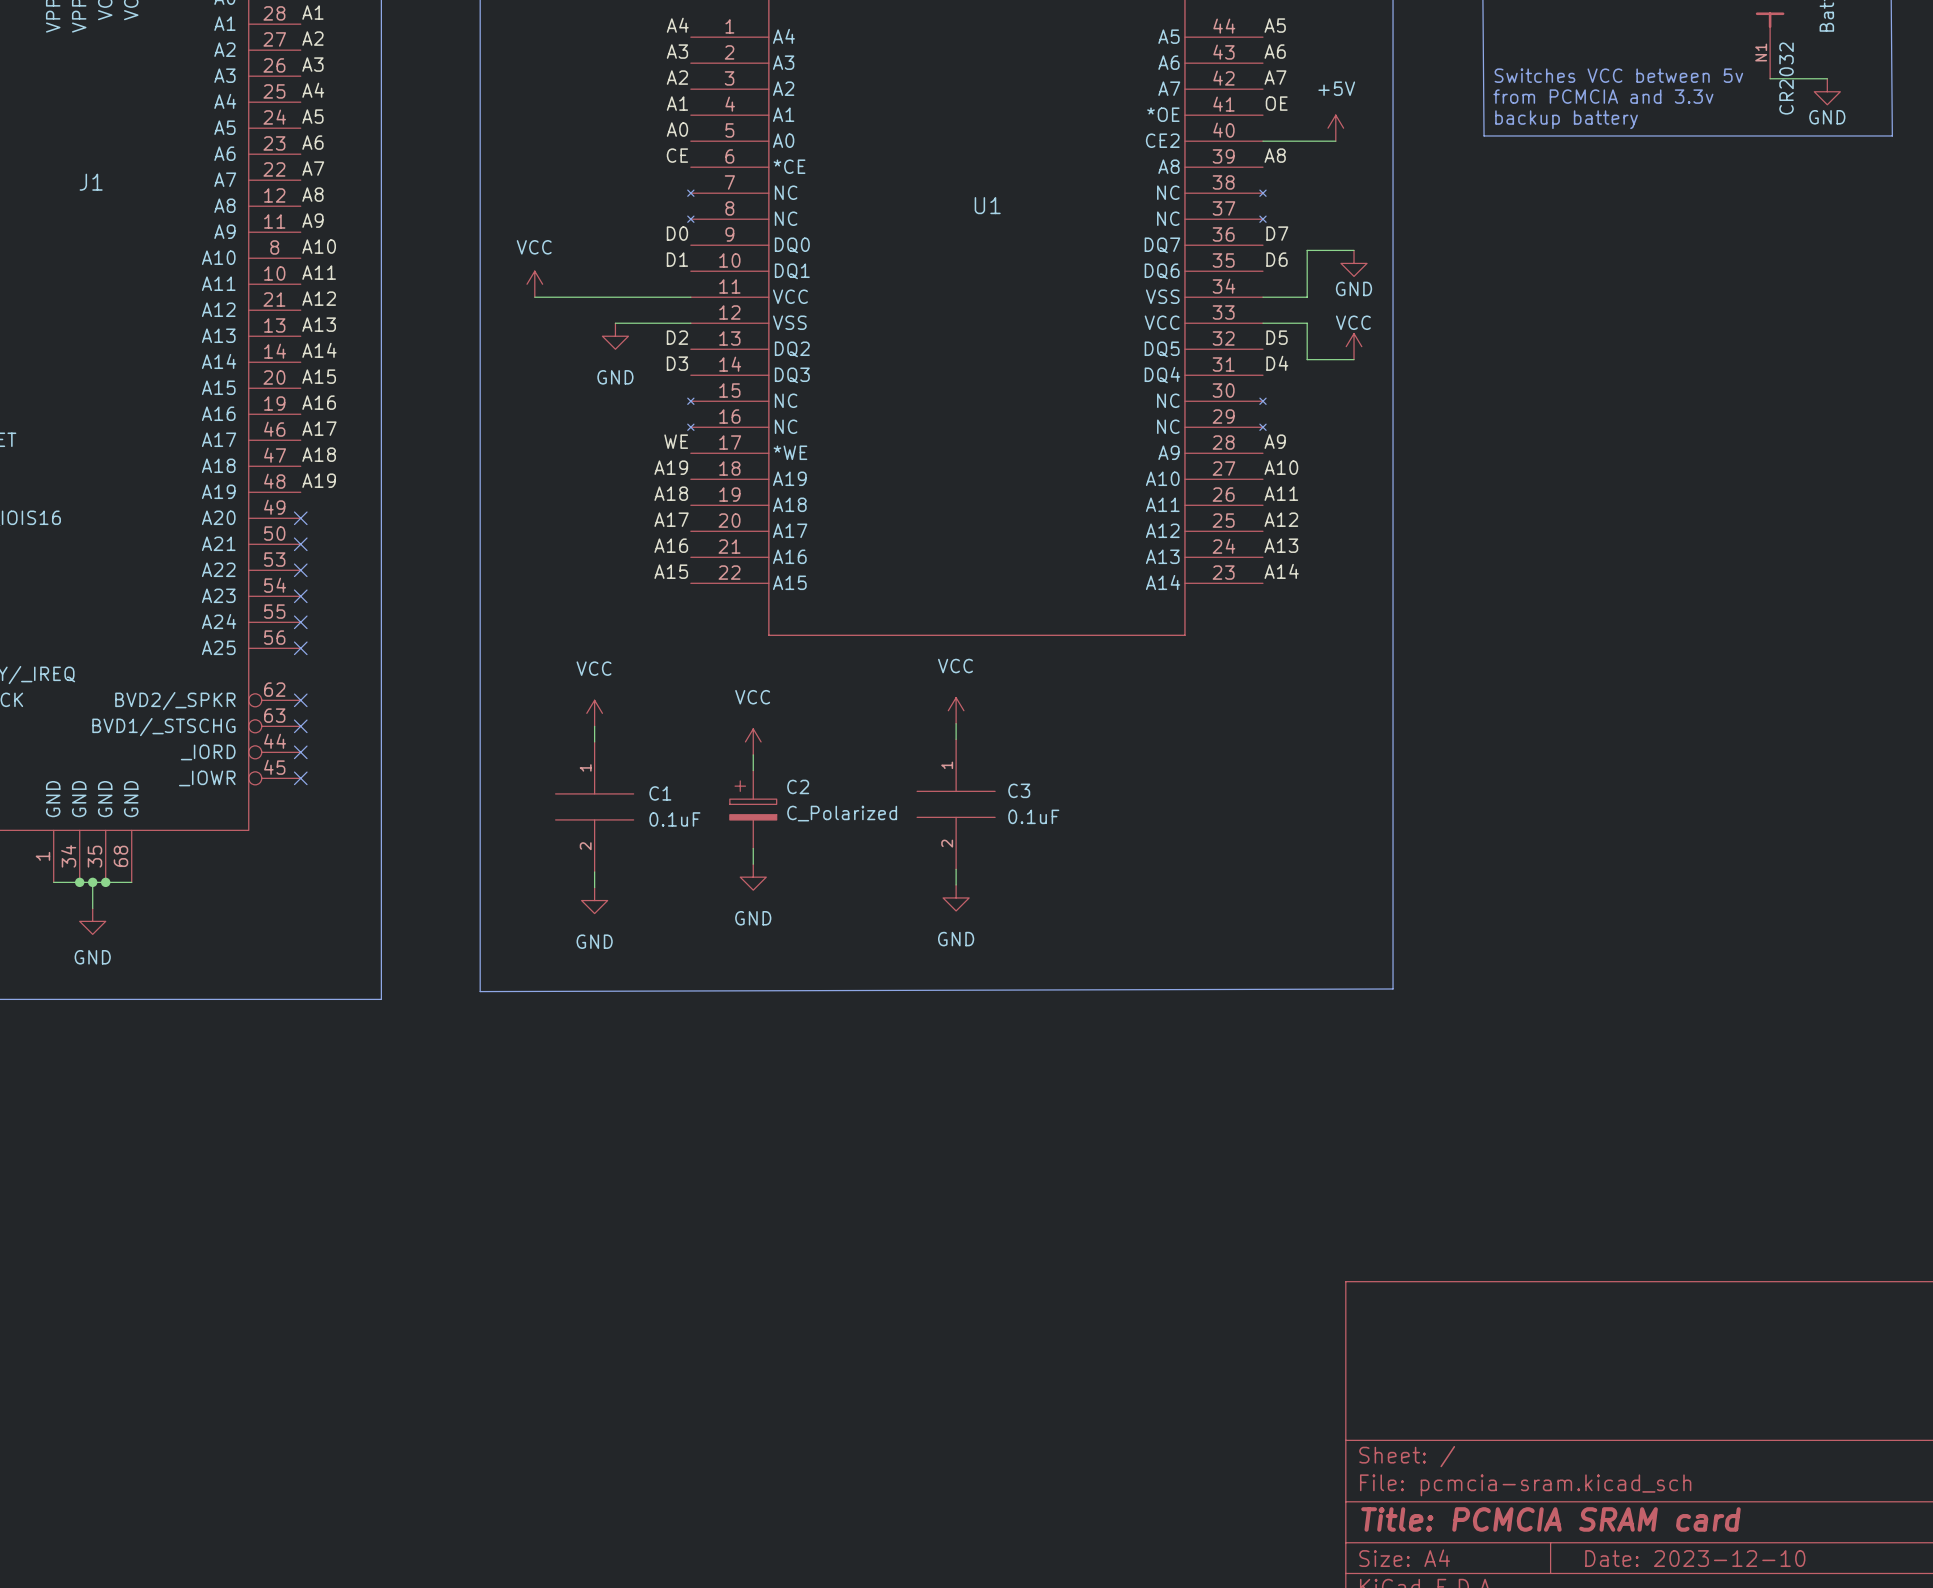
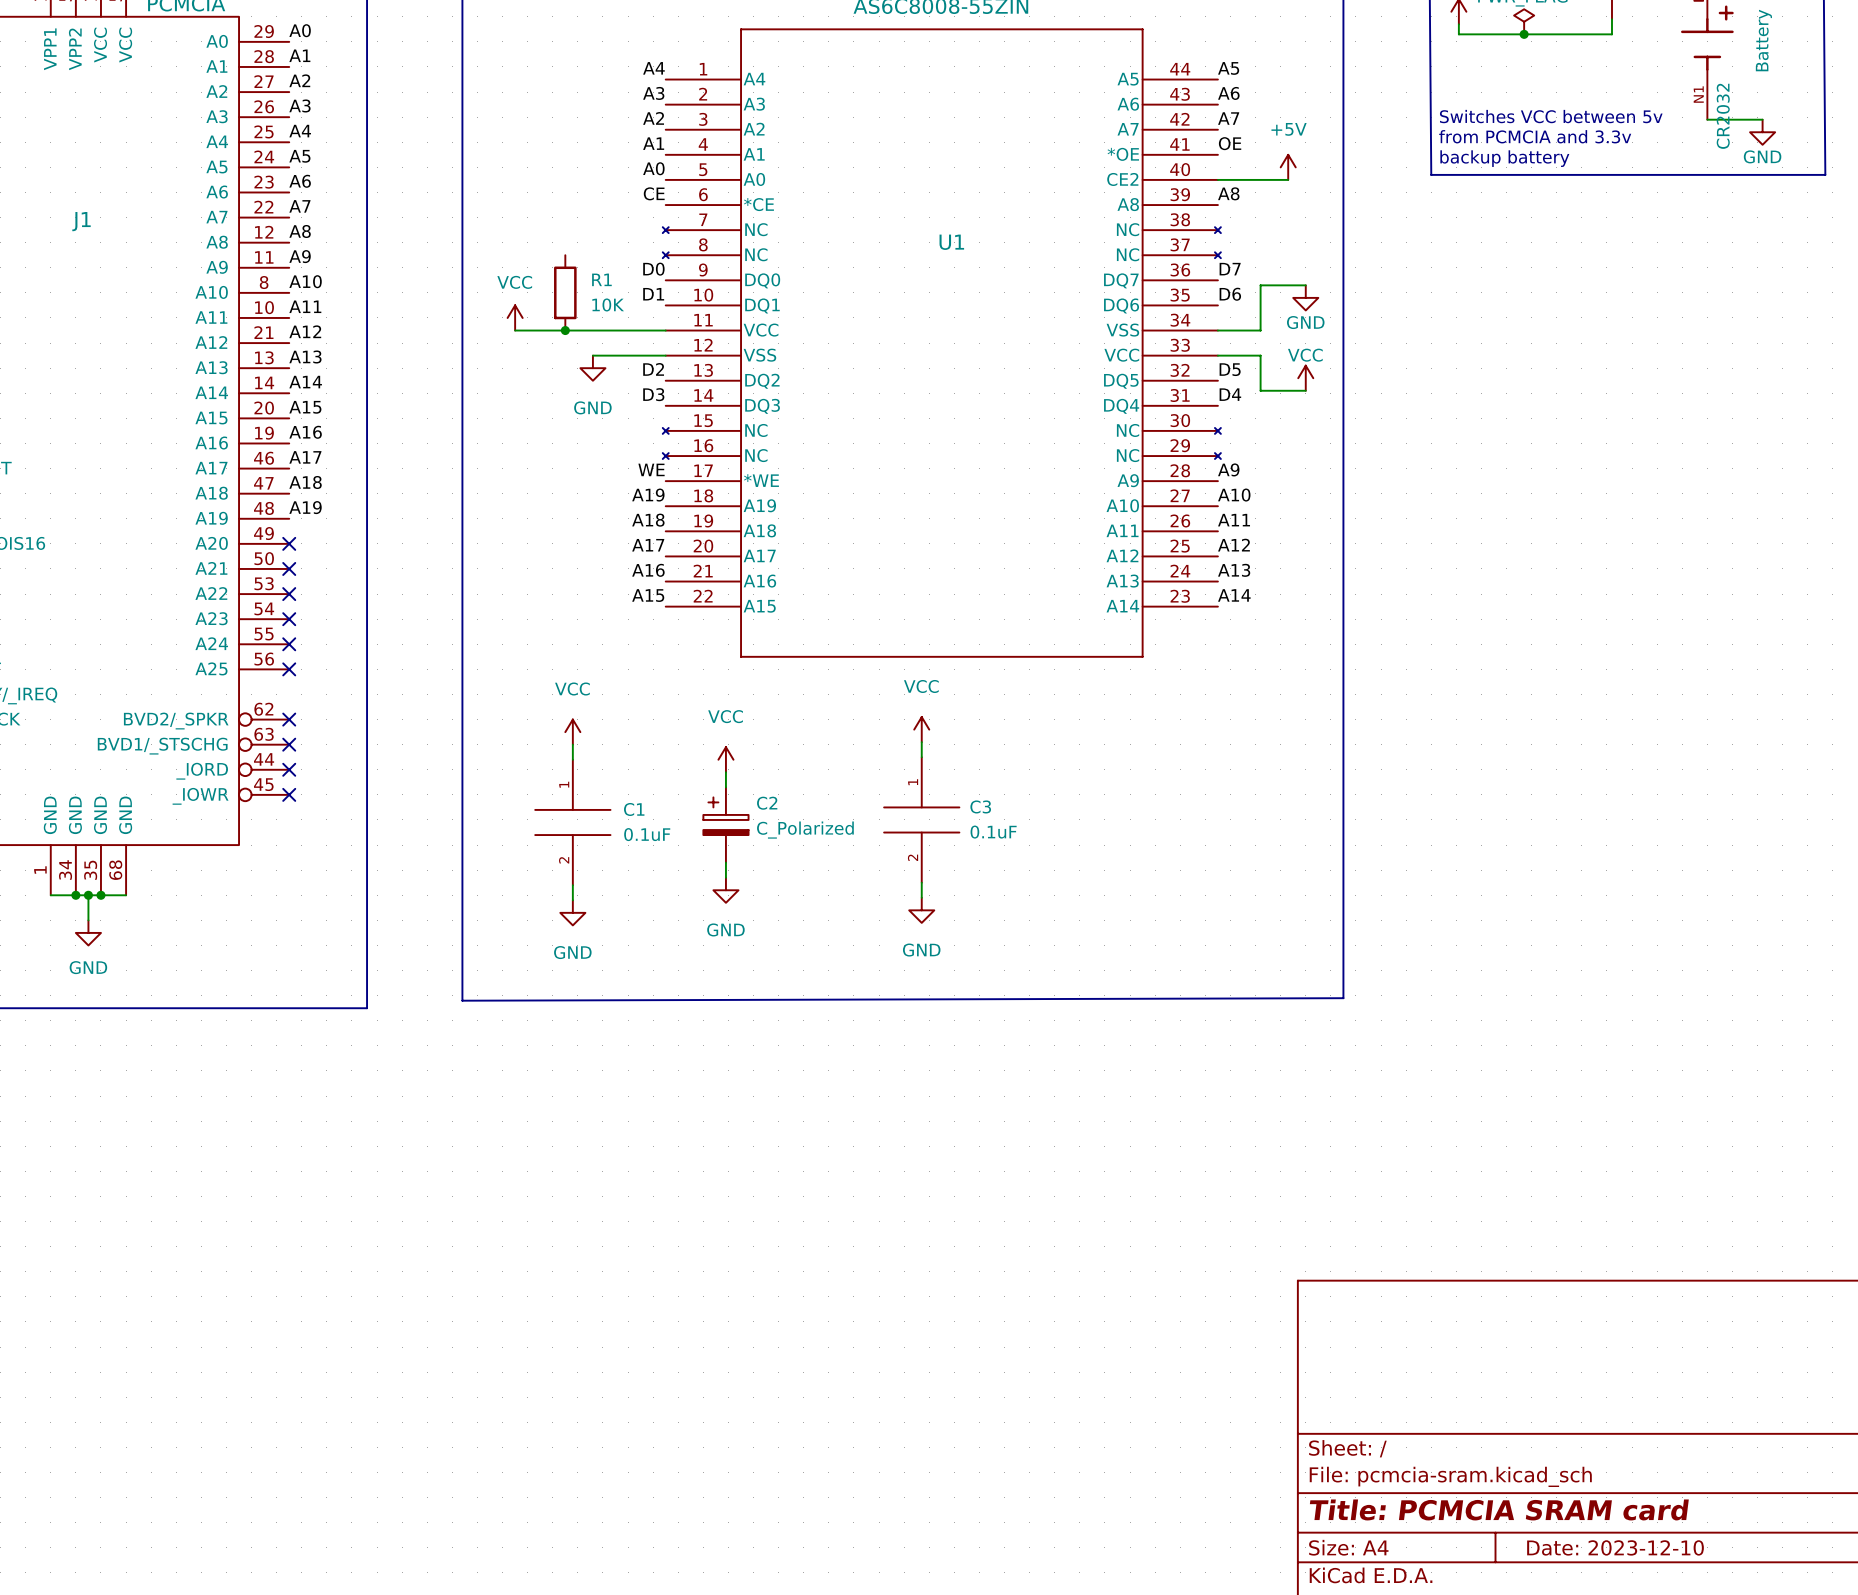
R1: none -> 10K (565, 292)
junction: none -> (565, 330)

